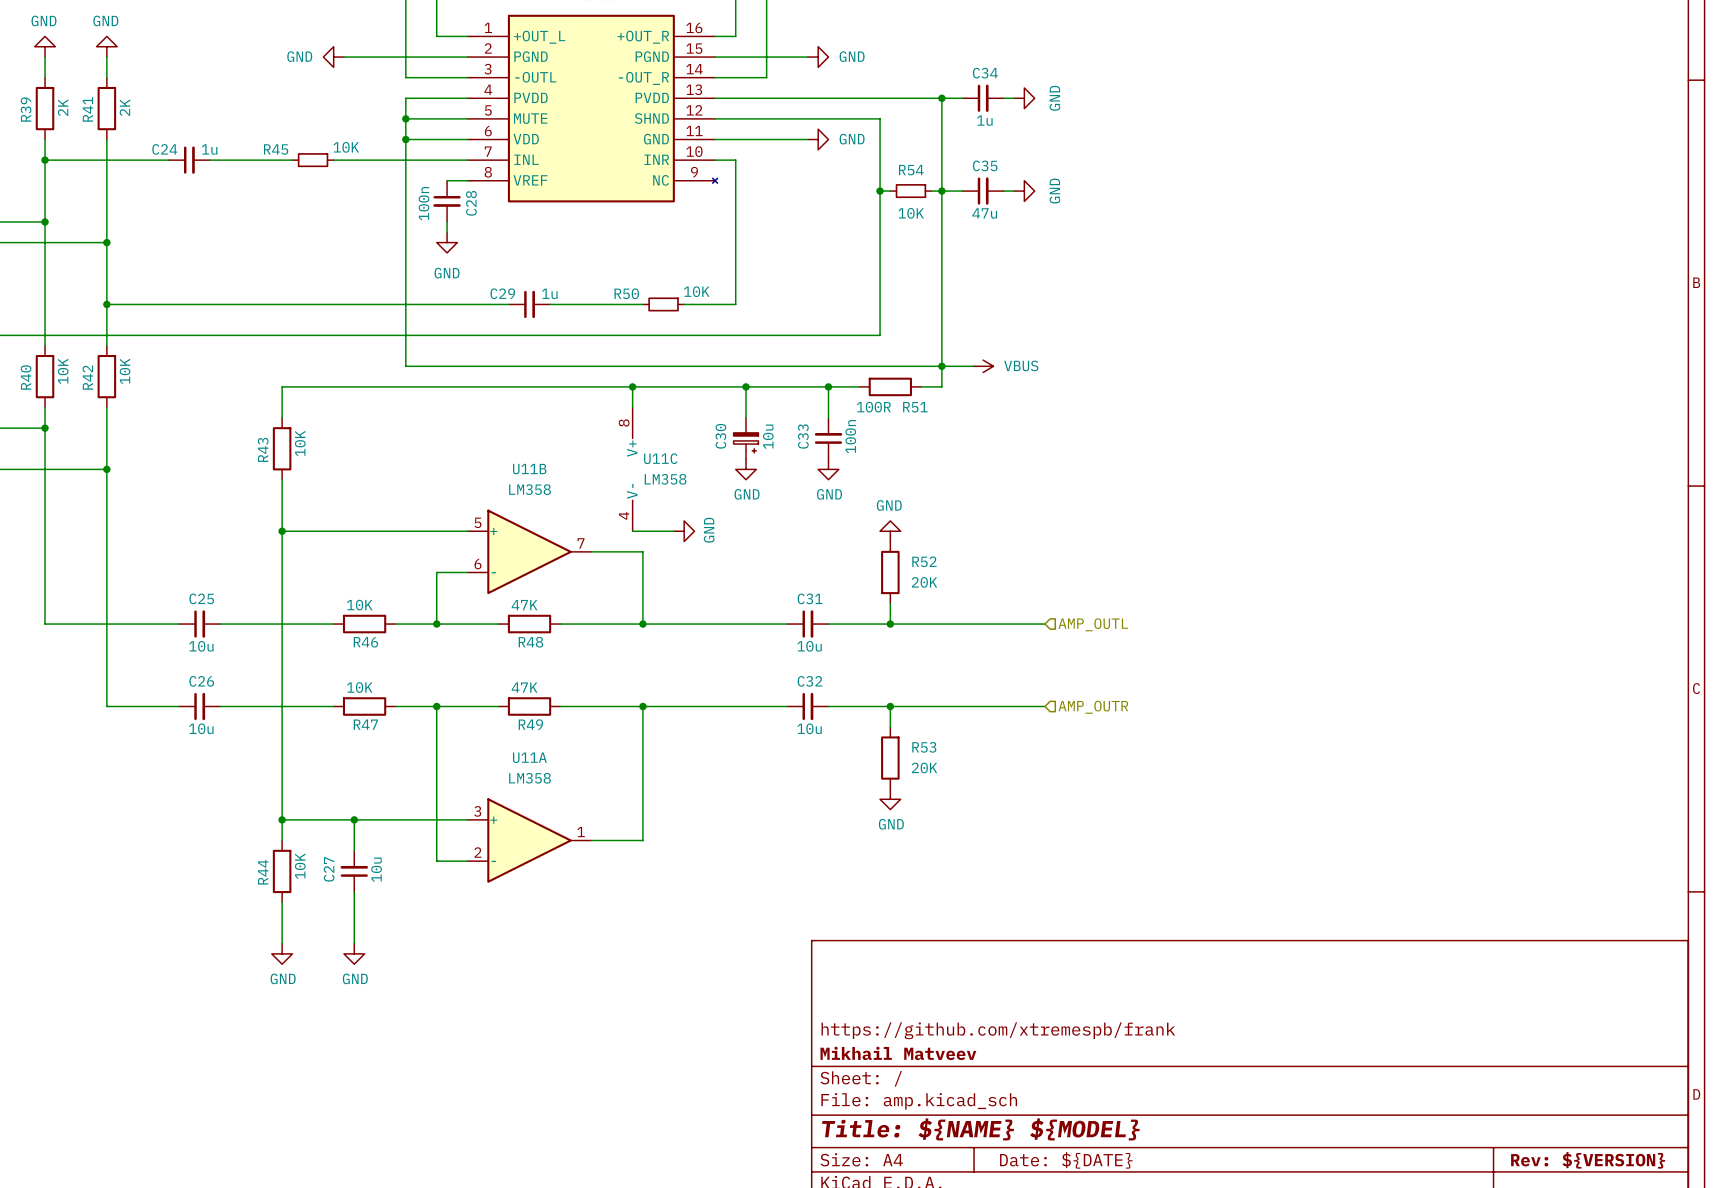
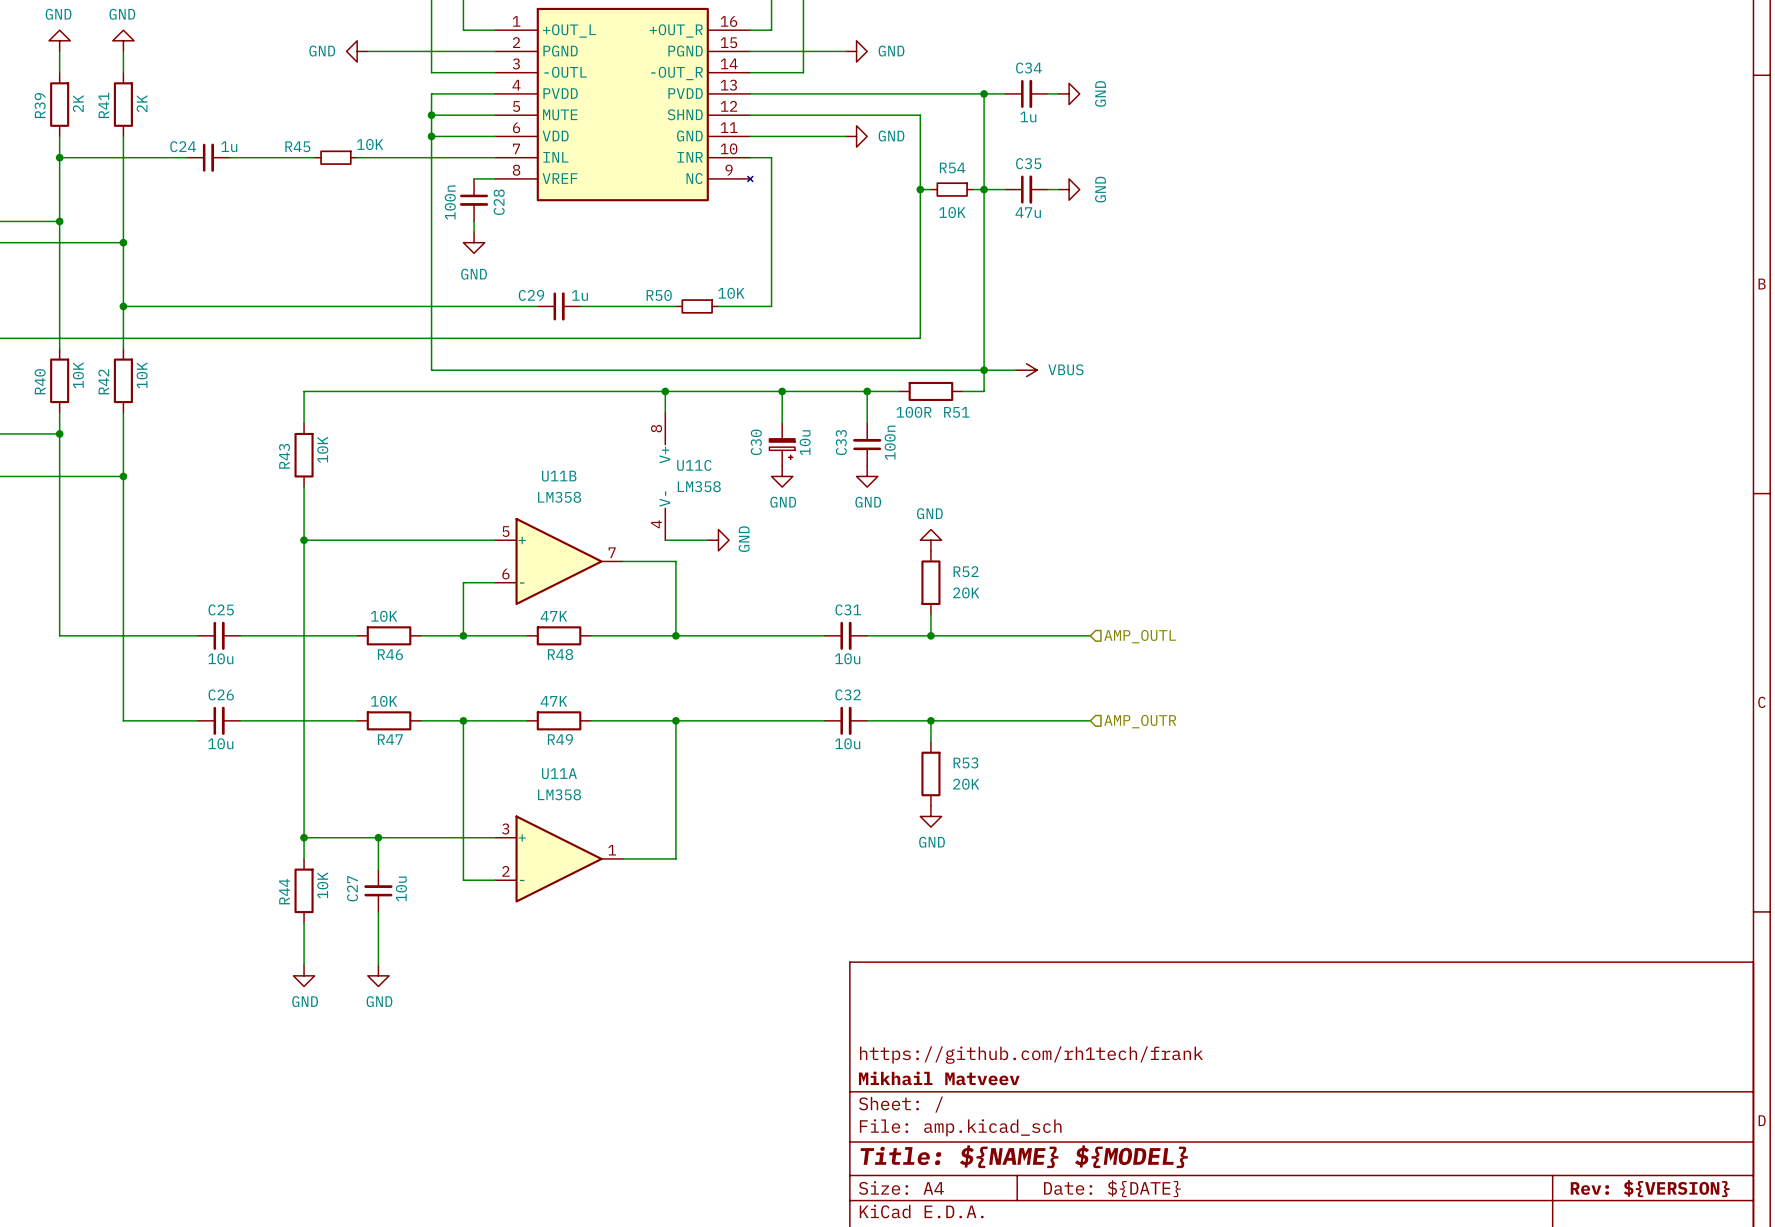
title block: https://github.com/xtremespb/frank (998, 1030) -> https://github.com/rh1tech/frank (1031, 1055)

